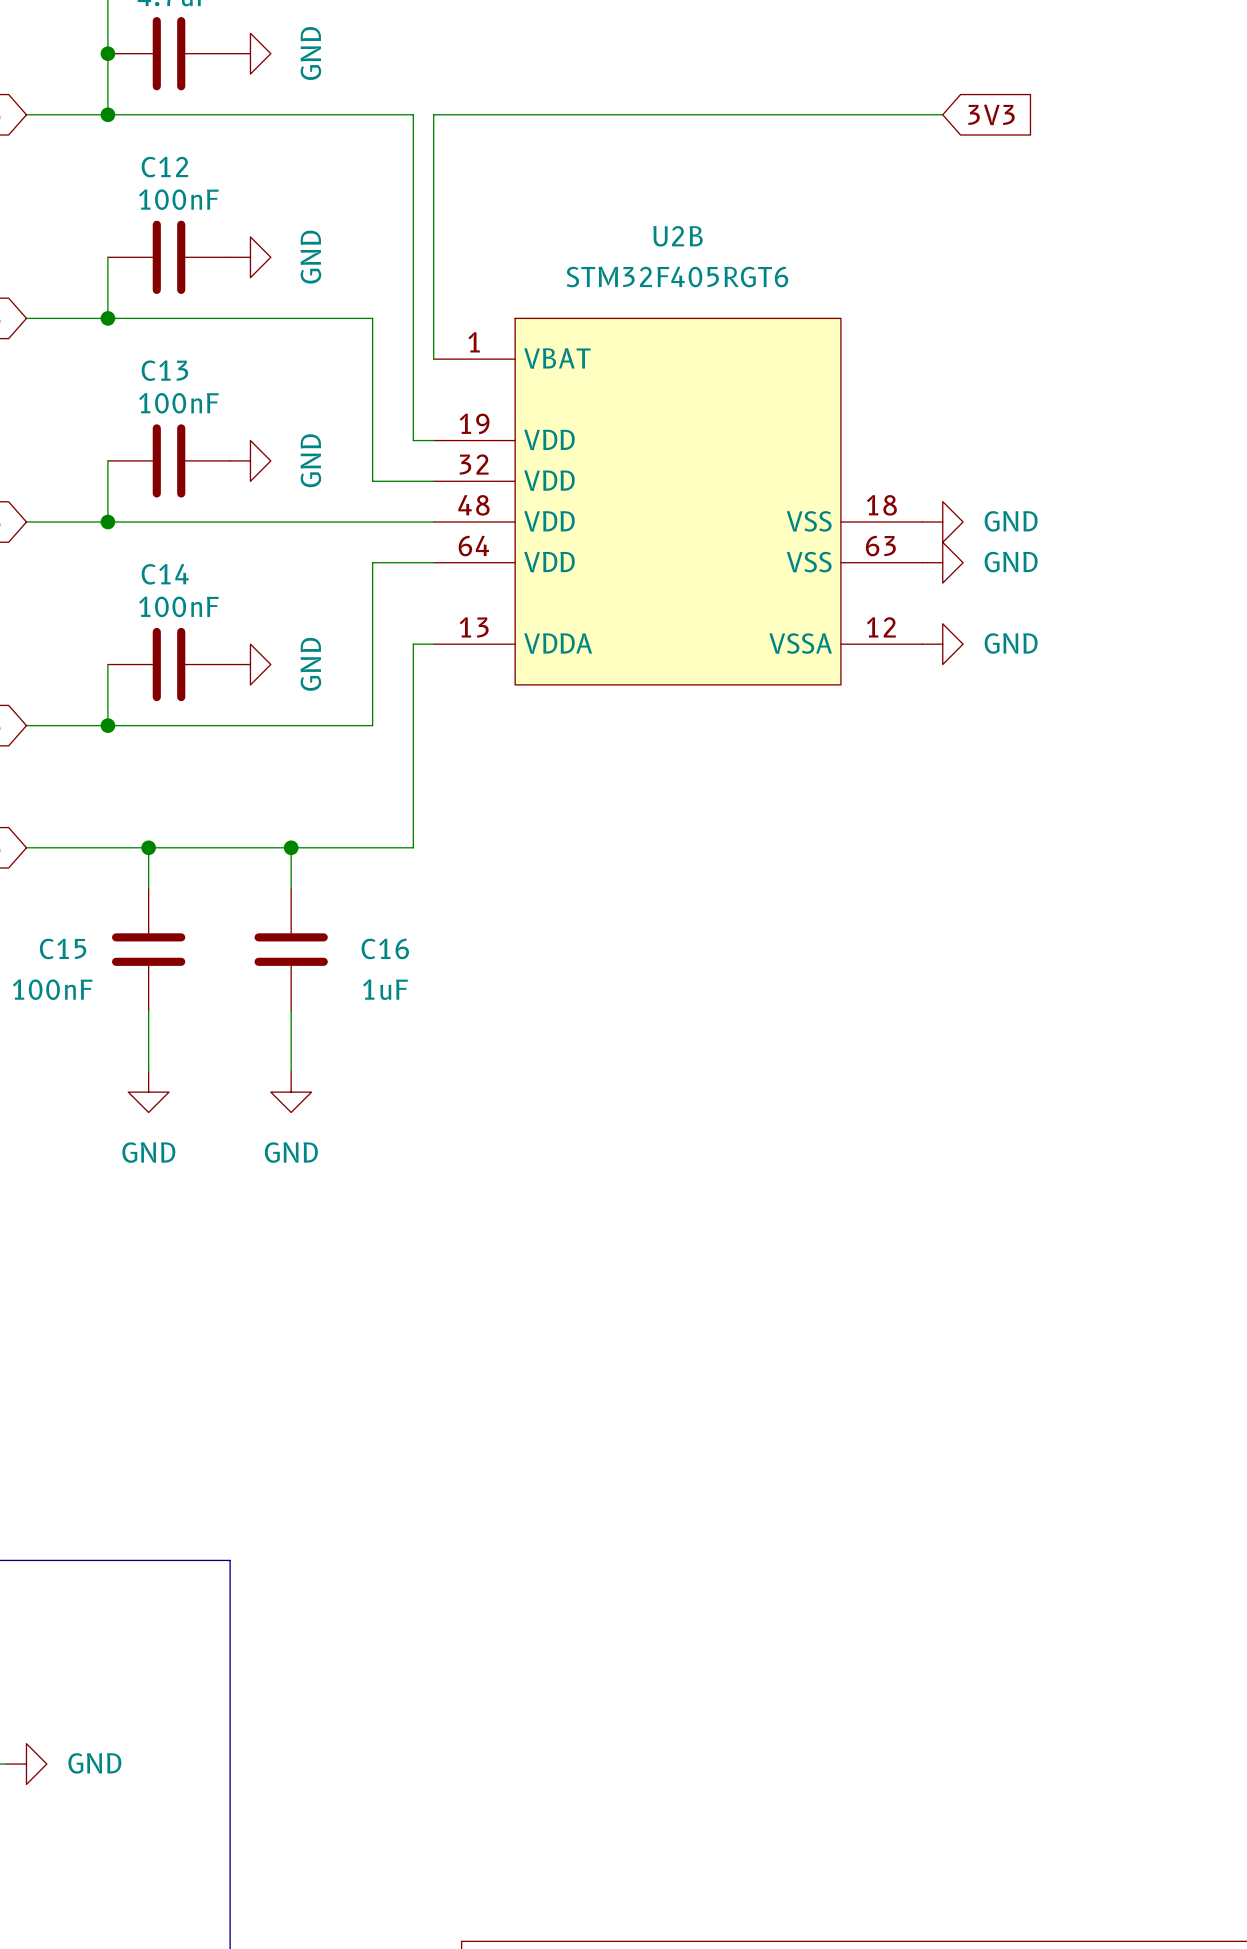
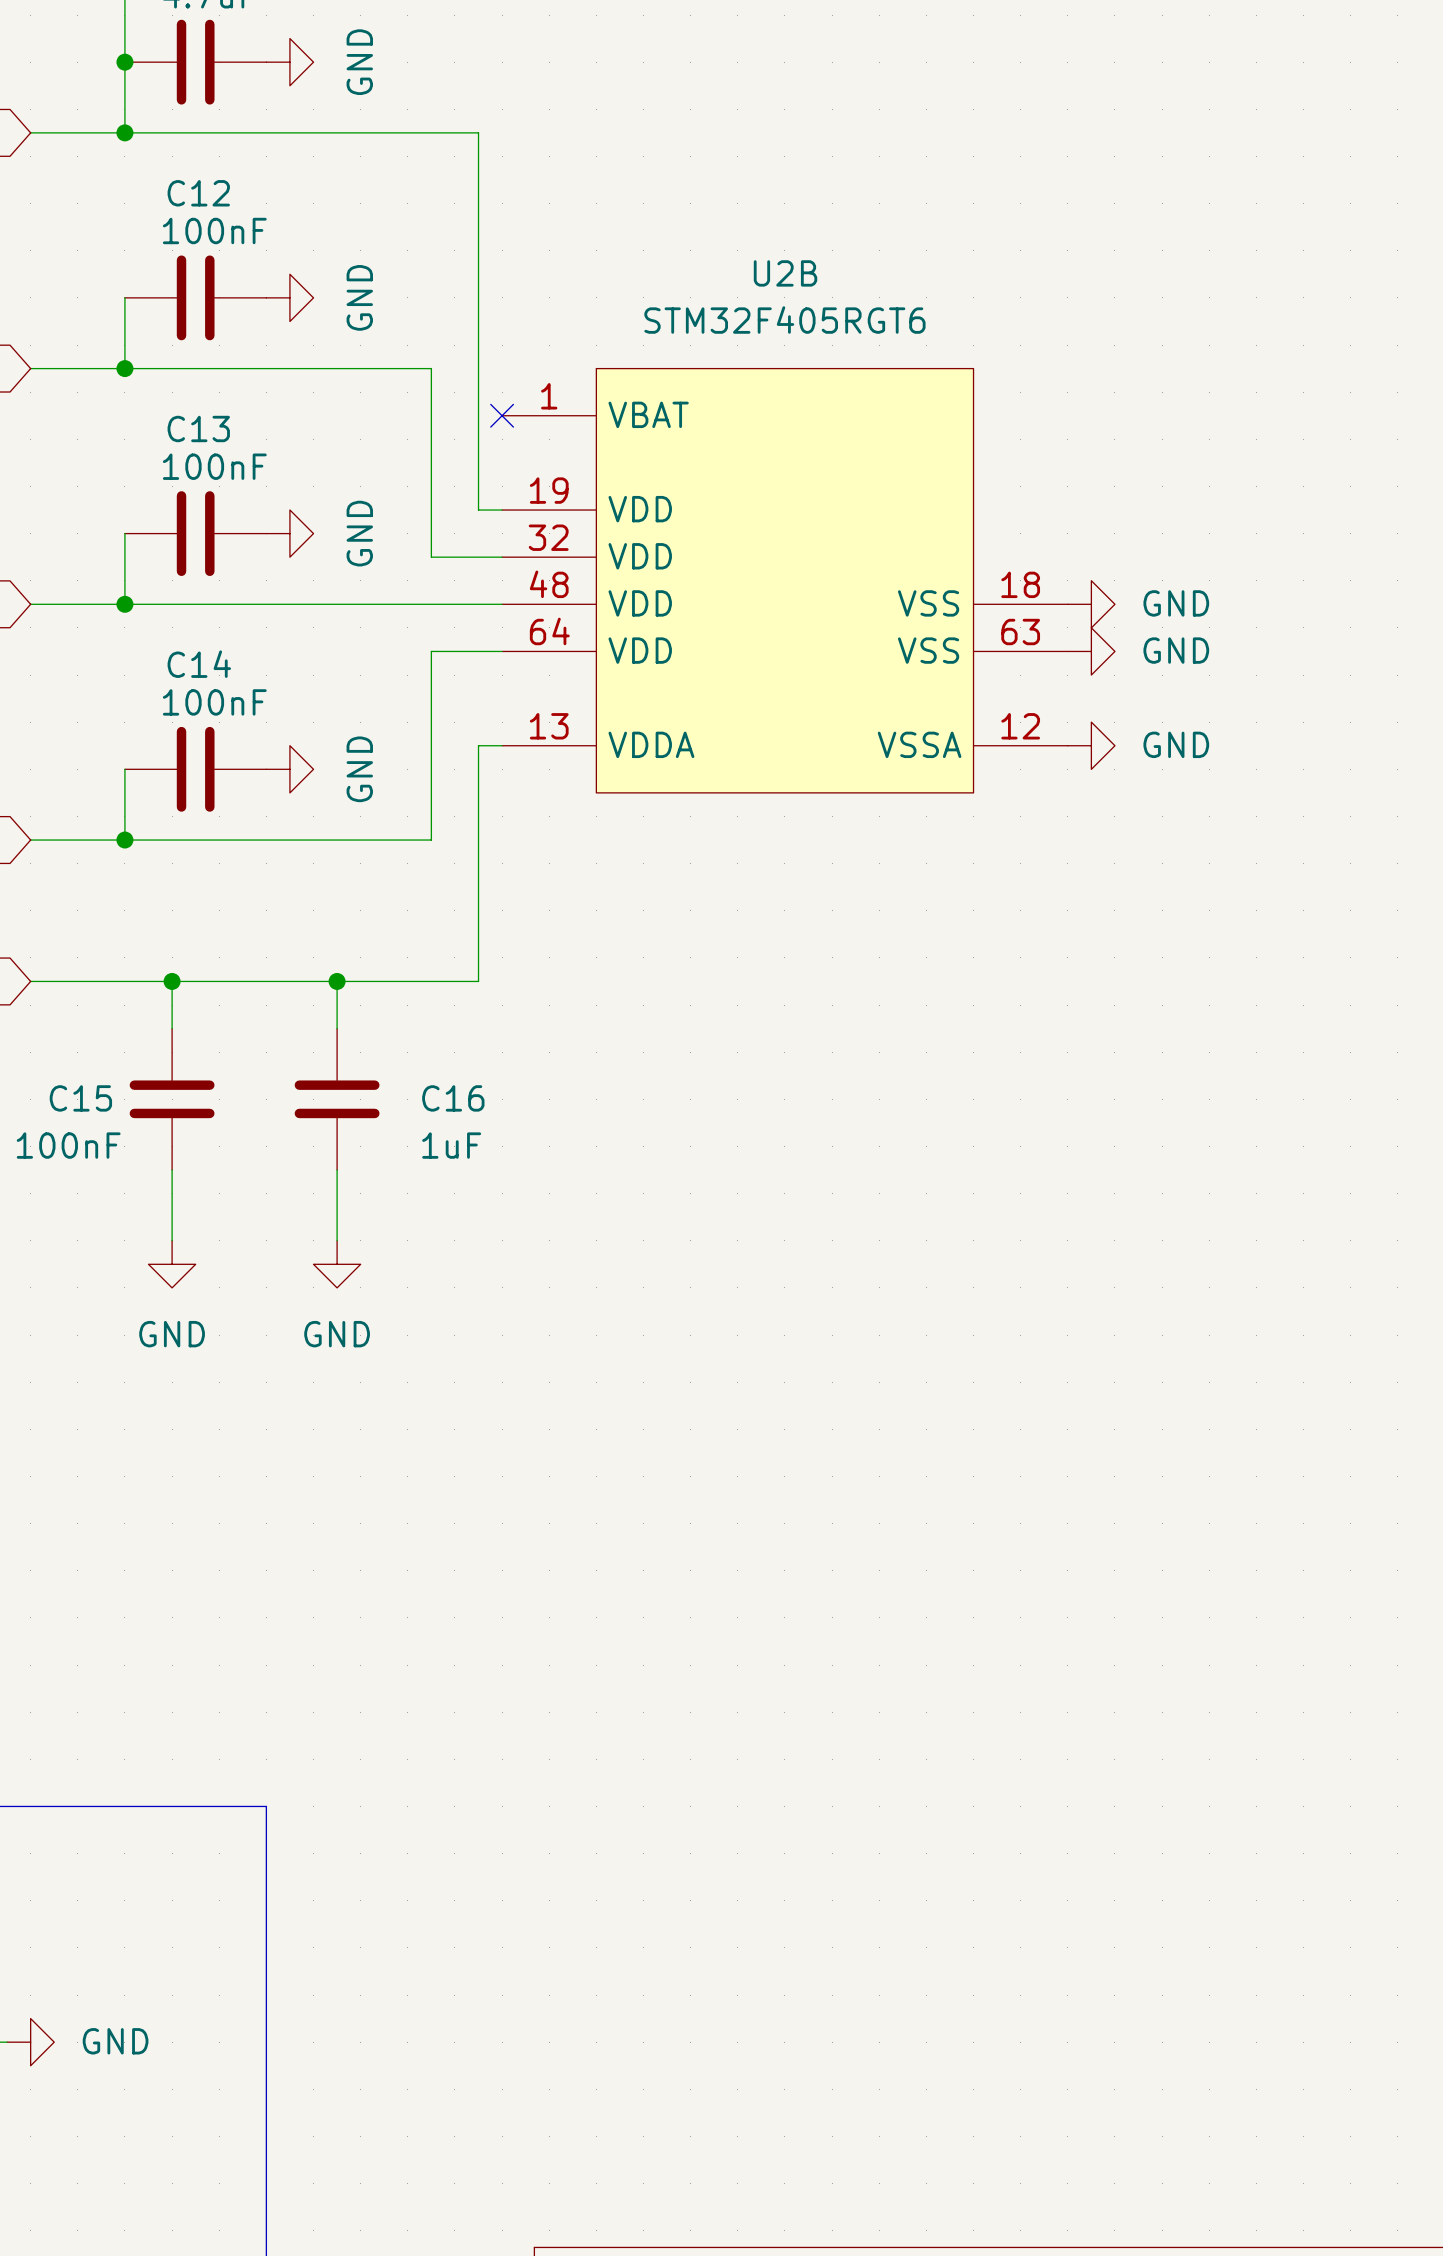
wire: (942, 114) (433, 114) (433, 359) -> none
global label: 3V3 (991, 114) -> none
no-connect mark: none -> (502, 415)

